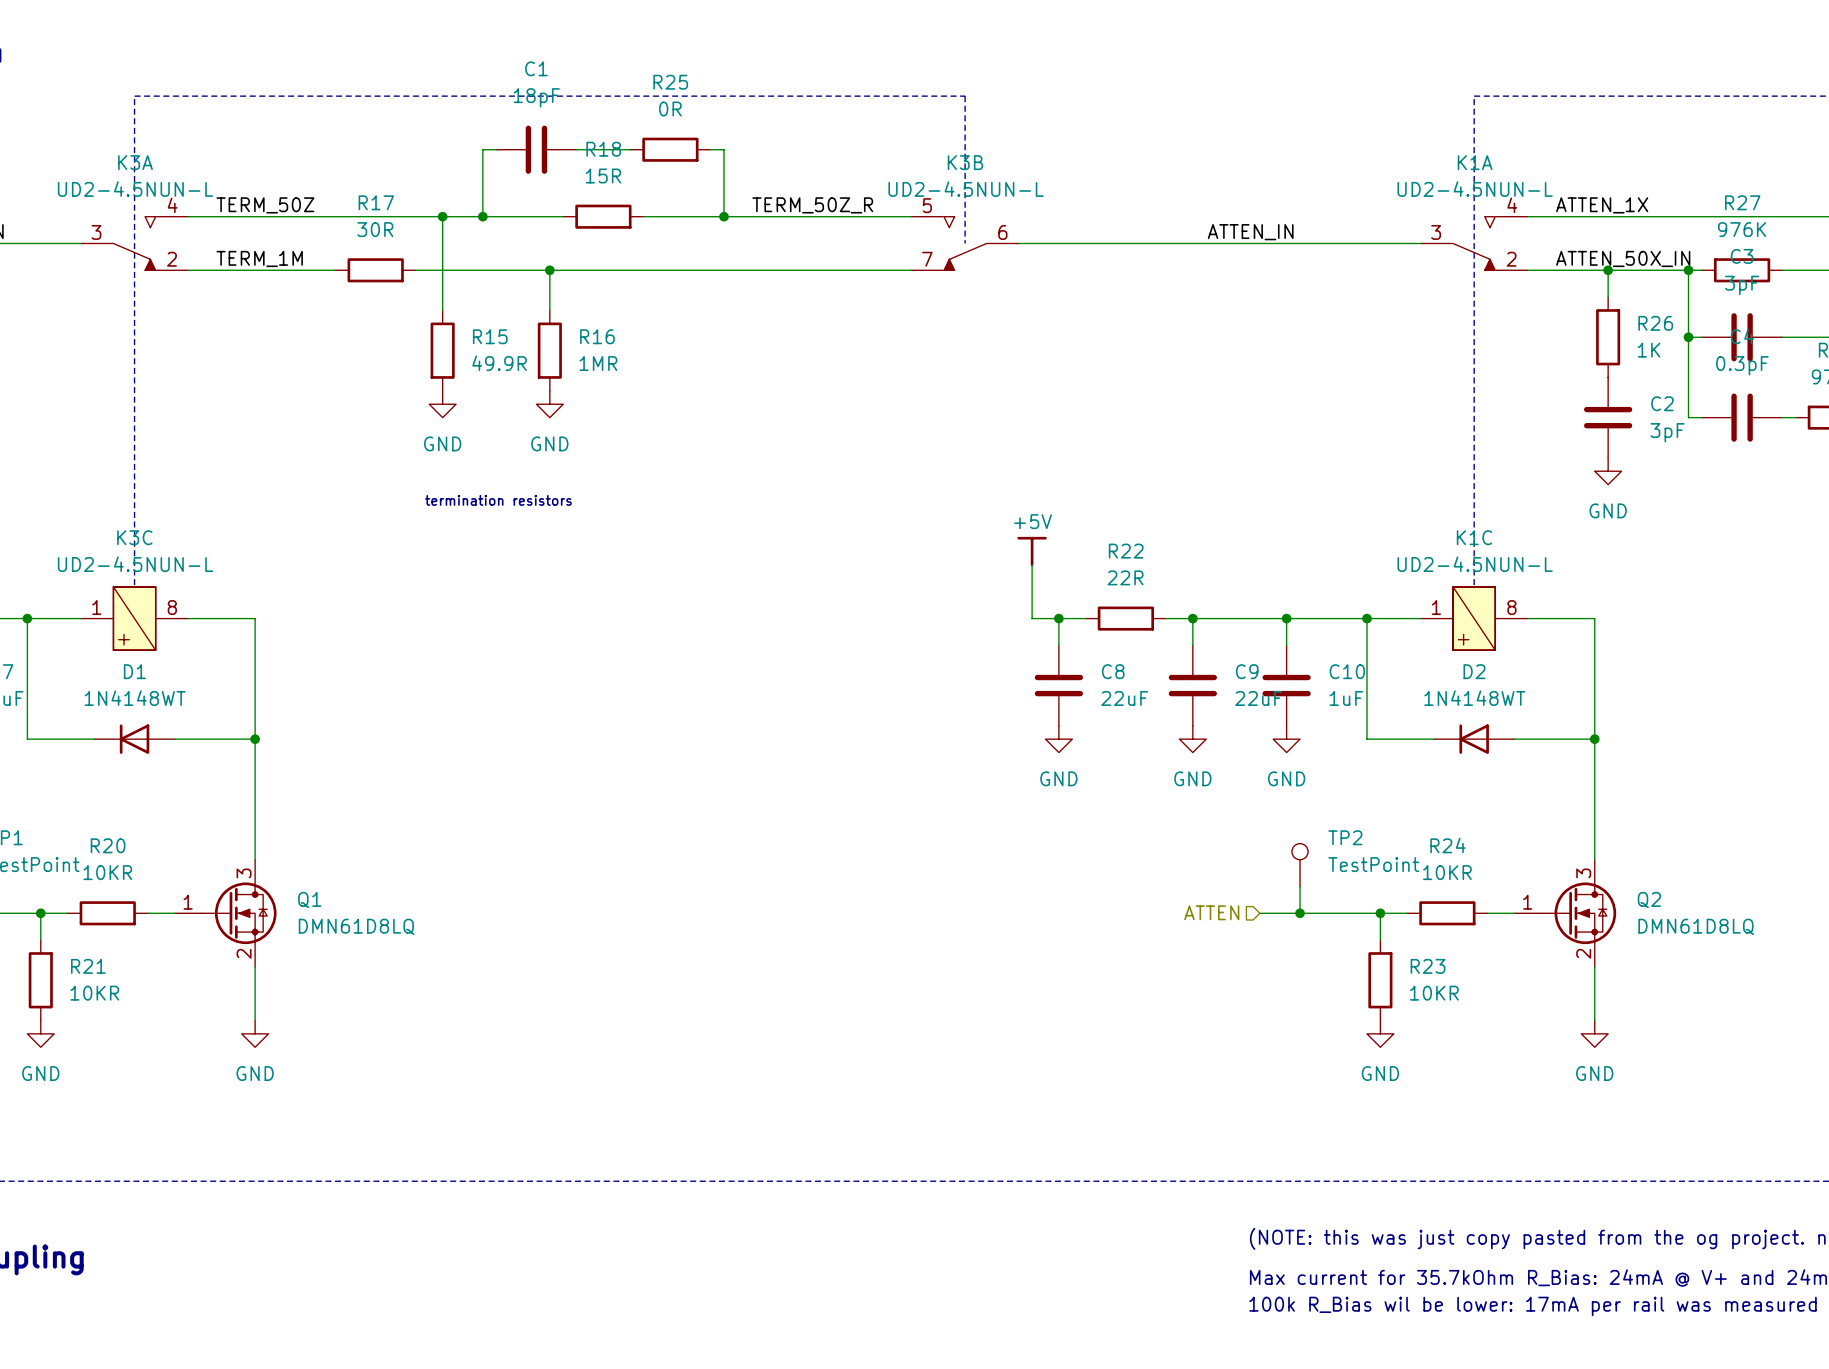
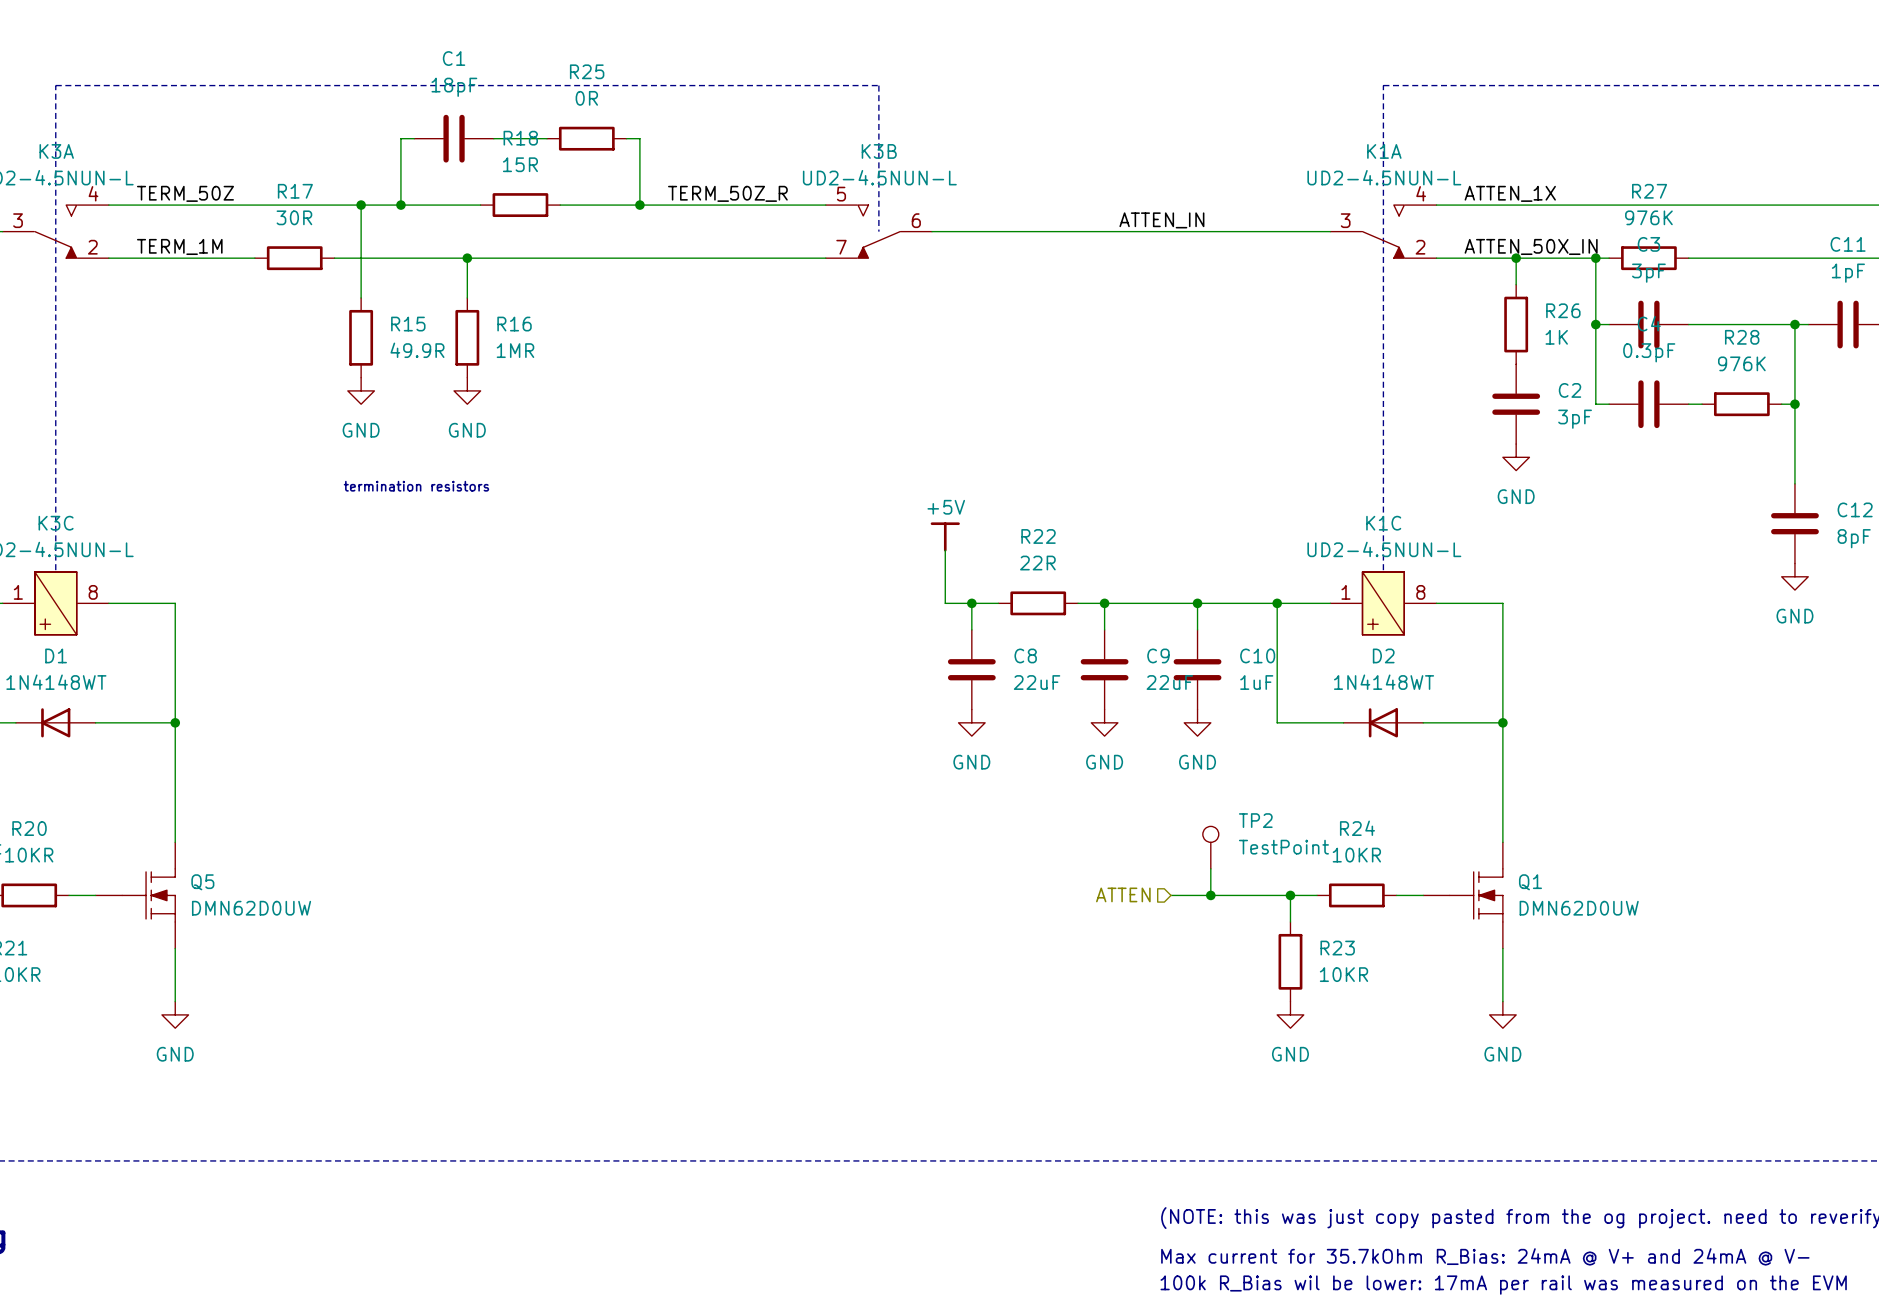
Q1 symbol: [174, 859, 277, 967] -> [1423, 842, 1503, 949]
Q5: none -> DMN62D0UW (135, 895)
Q2: DMN61D8LQ (1565, 913) -> none
Q1 value: DMN61D8LQ (356, 926) -> DMN62D0UW (1579, 908)

